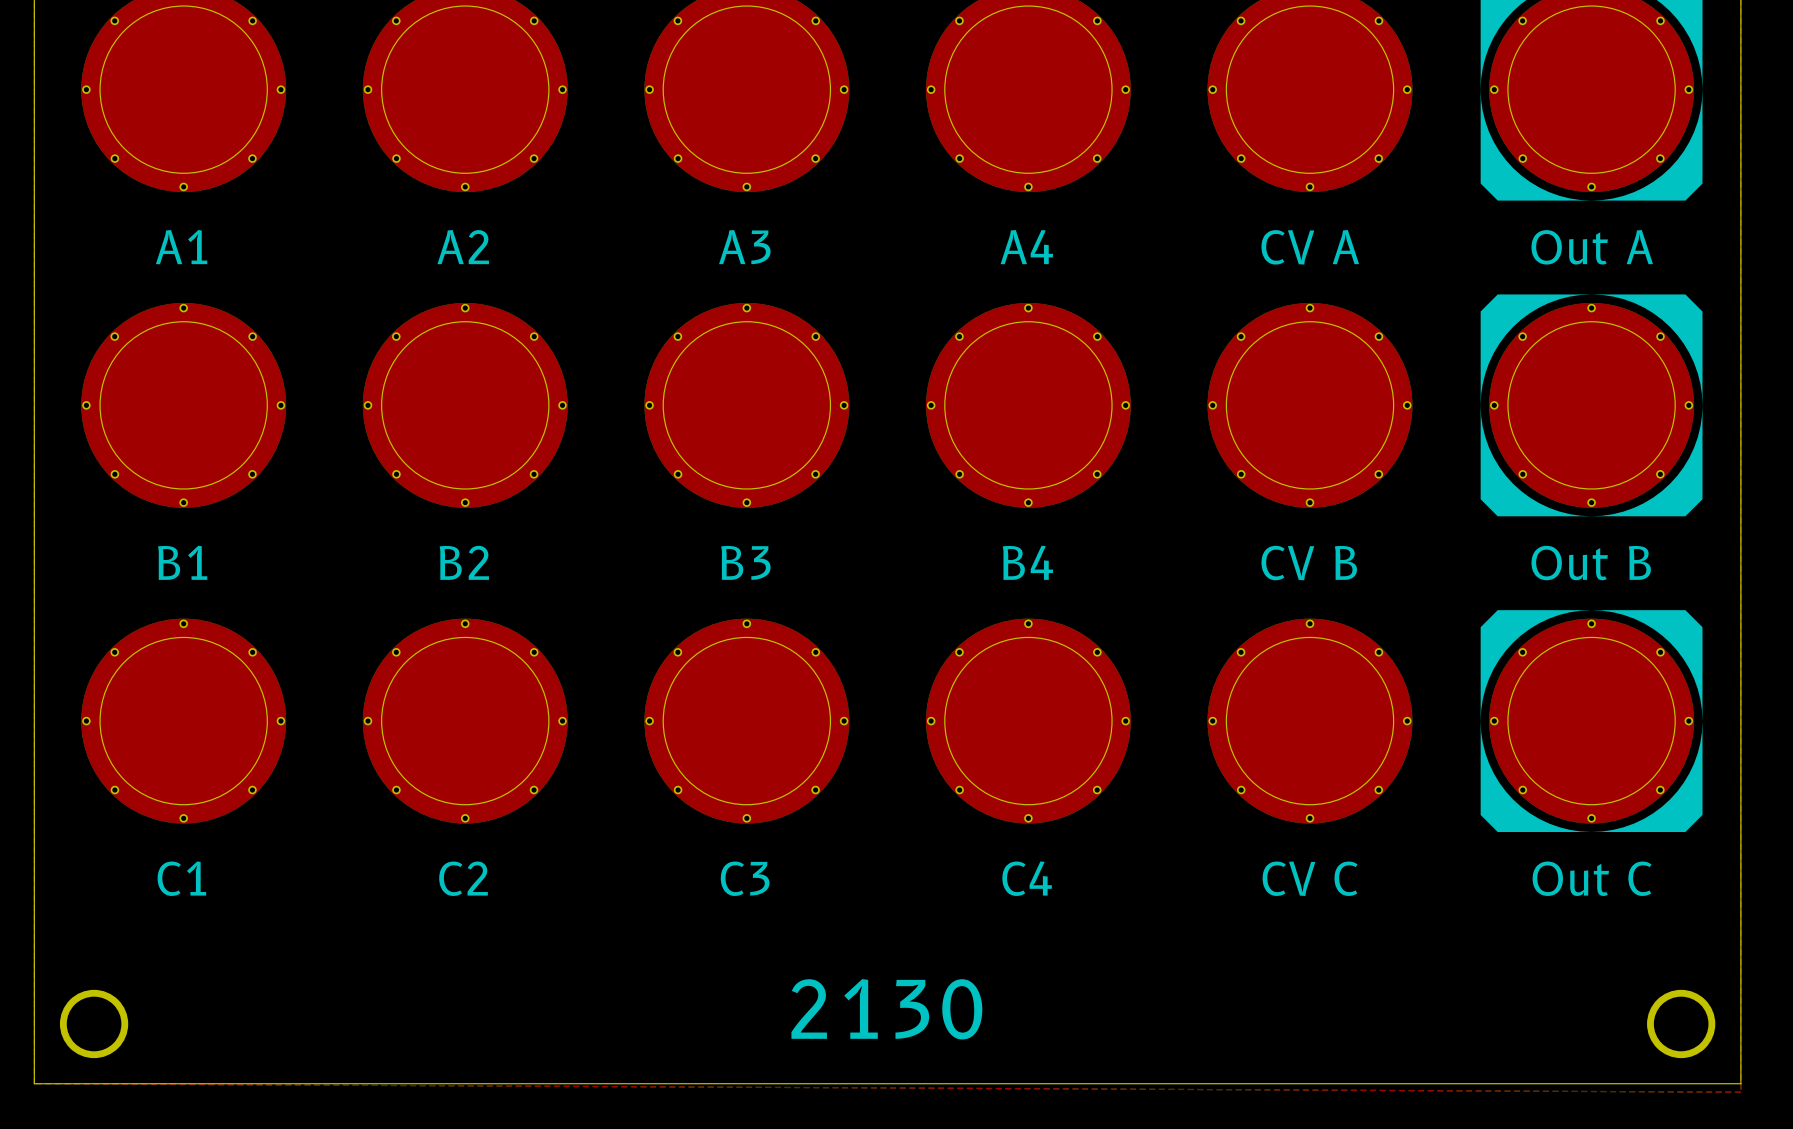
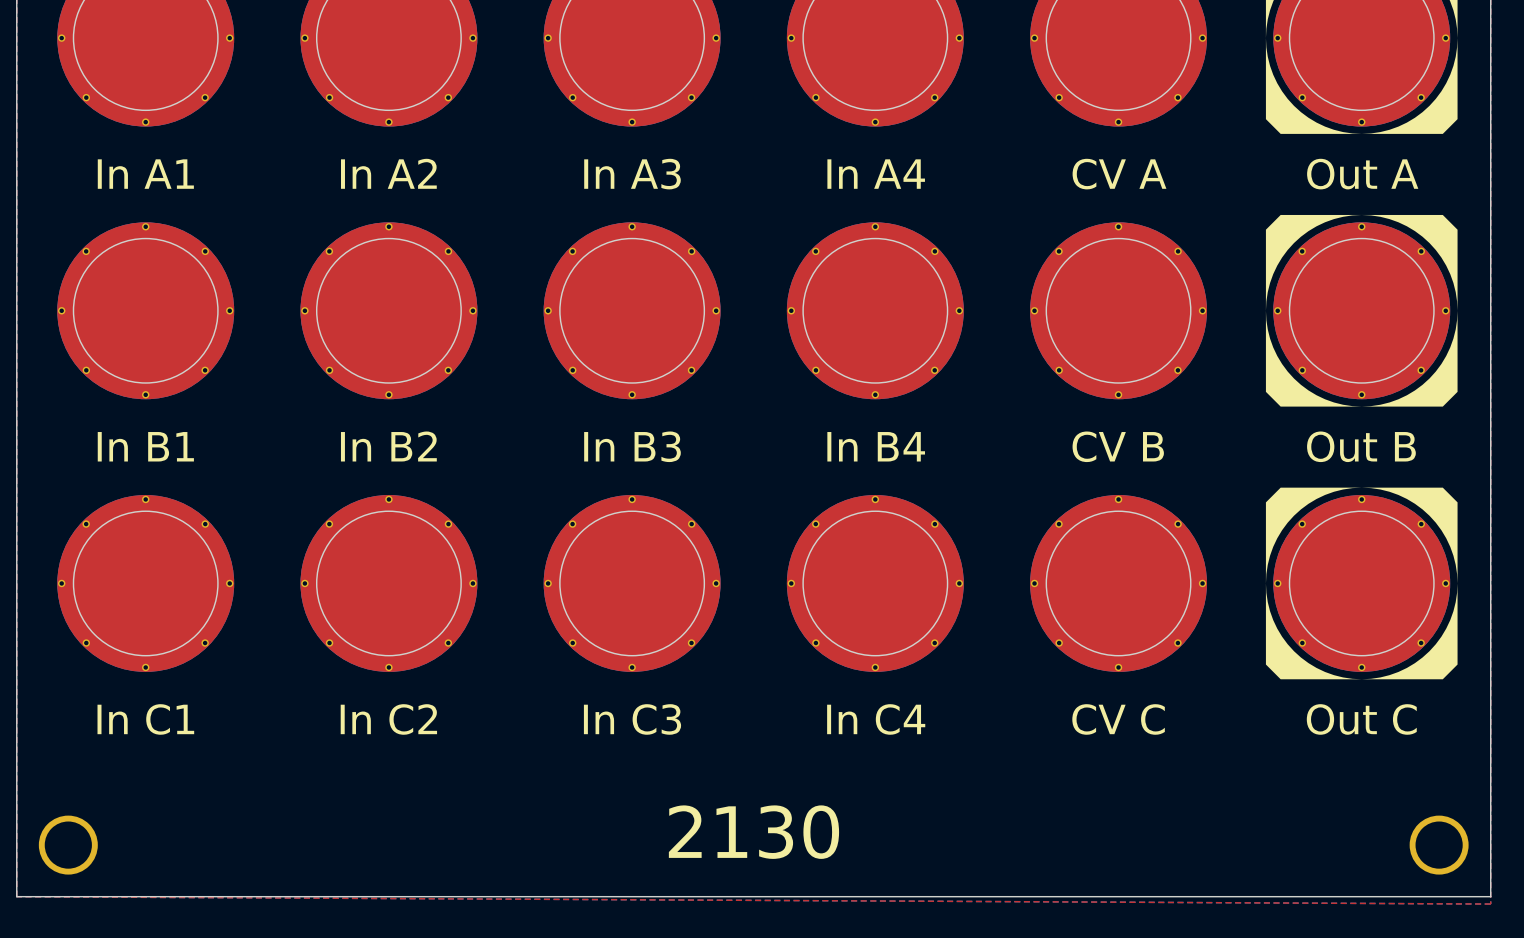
part value: A1 (181, 247) -> In A1 (145, 174)
part value: A2 (463, 247) -> In A2 (388, 173)
part value: A3 (744, 247) -> In A3 (632, 174)
part value: A4 (1026, 247) -> In A4 (876, 174)
part value: B1 (182, 562) -> In B1 (145, 446)
part value: B2 (464, 562) -> In B2 (388, 446)
part value: B3 (745, 562) -> In B3 (632, 446)
part value: B4 (1027, 562) -> In B4 (876, 446)
part value: C1 (181, 878) -> In C1 (145, 719)
part value: C2 (463, 878) -> In C2 (388, 719)
part value: C3 (745, 878) -> In C3 (632, 719)
part value: C4 (1027, 878) -> In C4 (876, 719)

